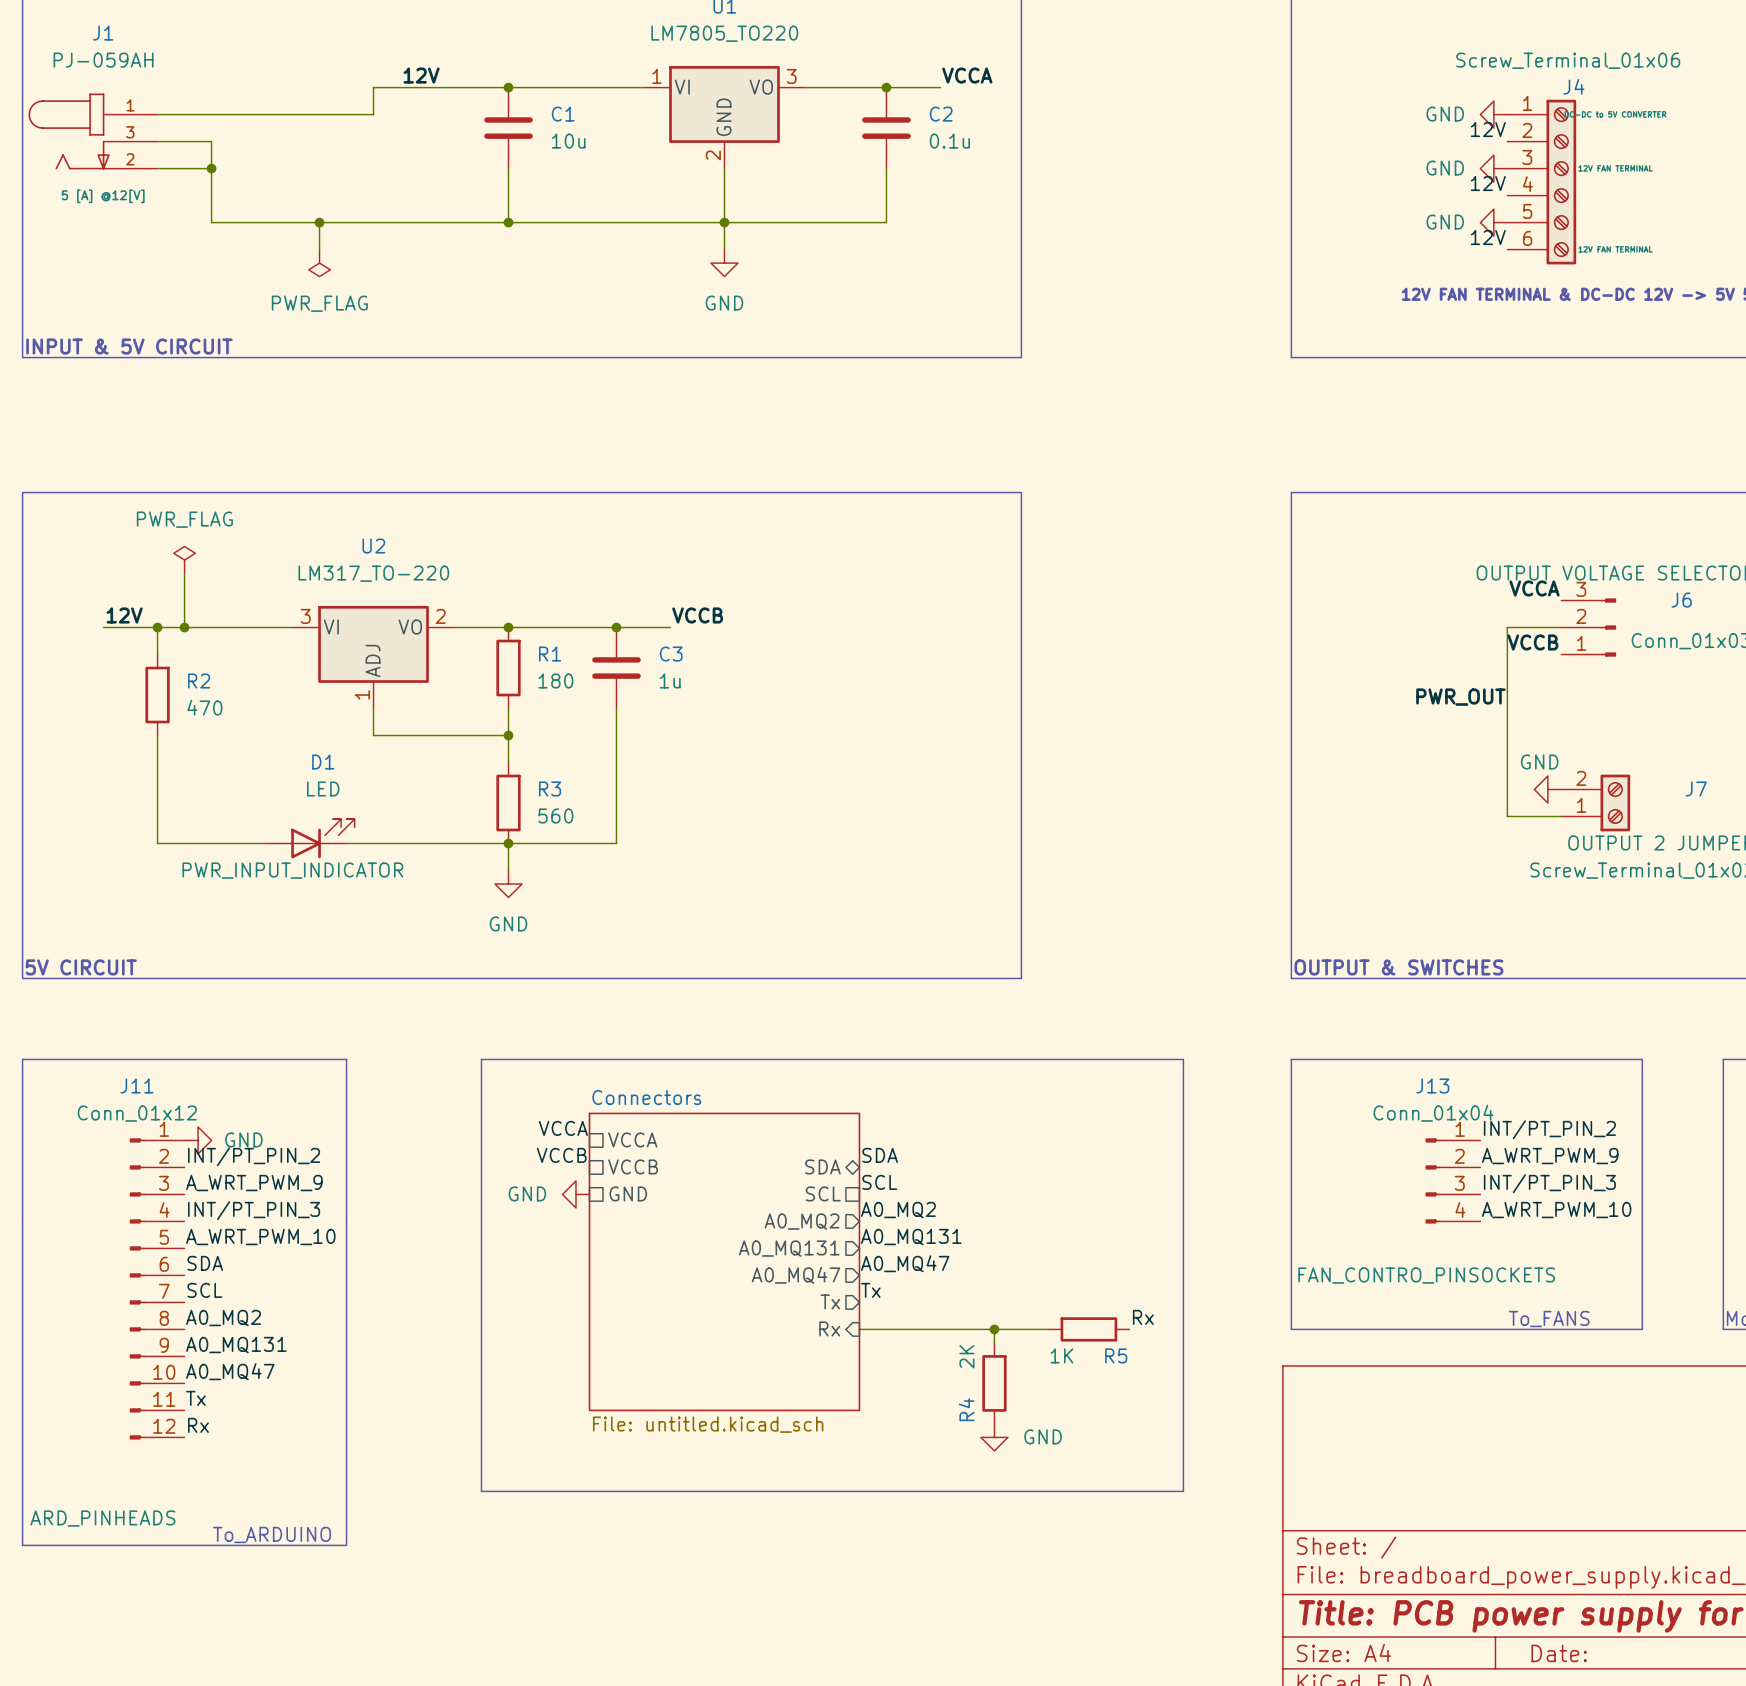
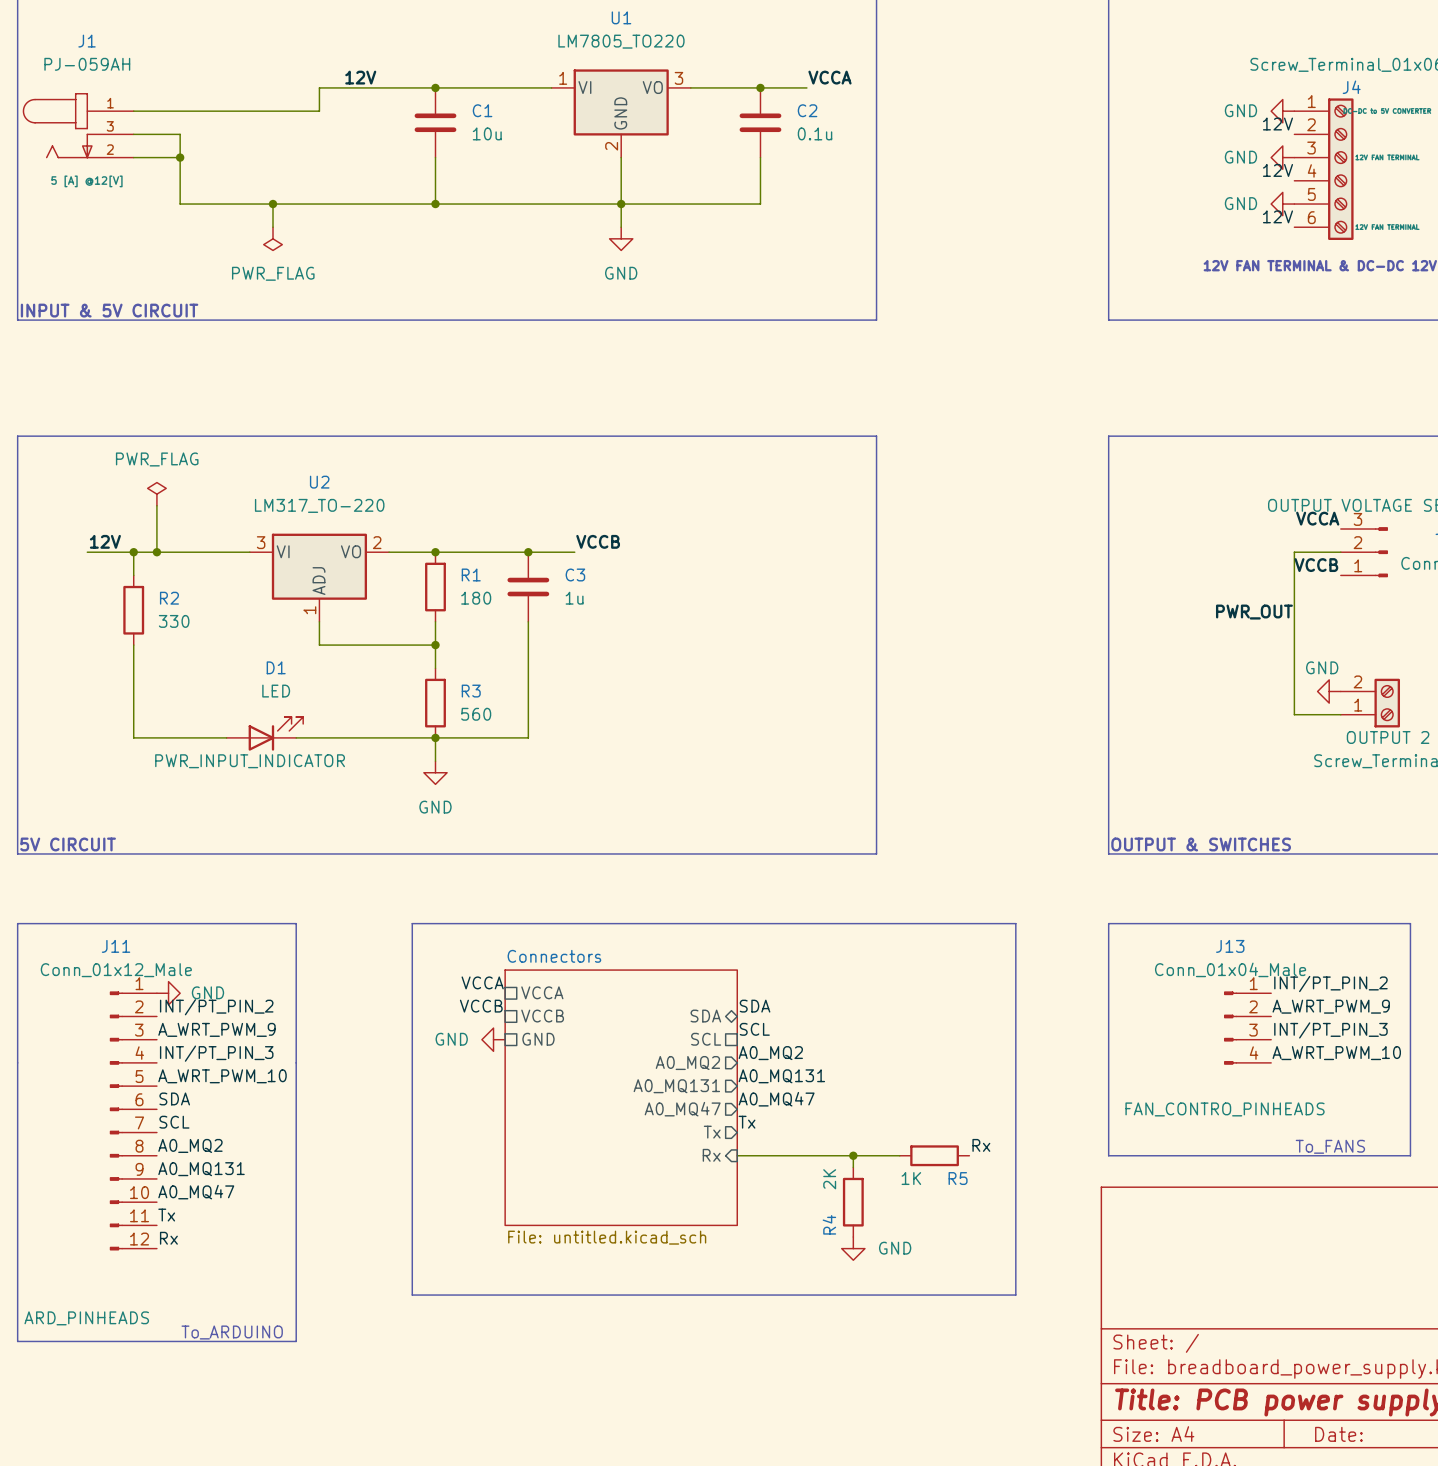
R2 value: 470 (204, 707) -> 330 (174, 621)
J11 value: Conn_01x12 (137, 1113) -> Conn_01x12_Male (116, 970)
J13 value: Conn_01x04 (1433, 1113) -> Conn_01x04_Male (1230, 969)
J13 text: FAN_CONTRO_PINSOCKETS (1426, 1275) -> FAN_CONTRO_PINHEADS (1225, 1109)

